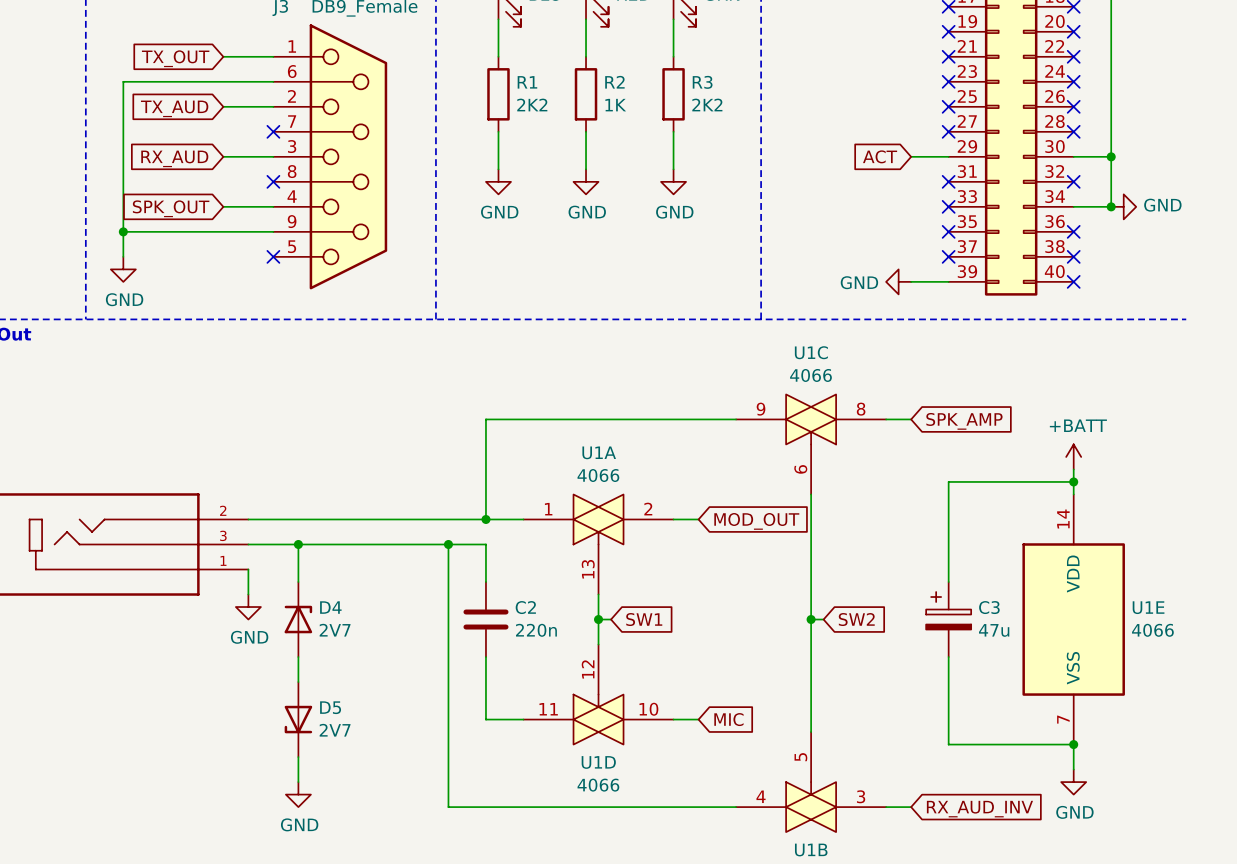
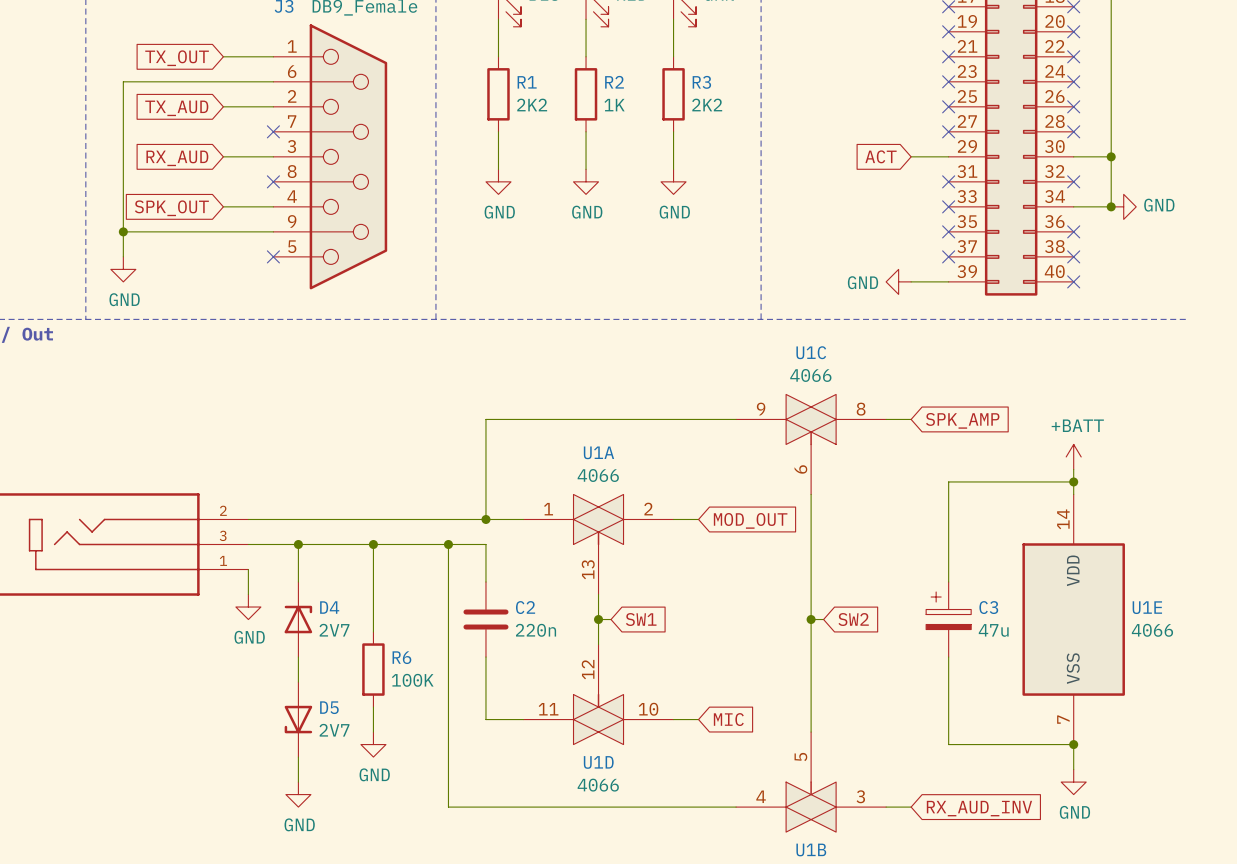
wire: none -> (373, 544) (373, 632)
junction: none -> (373, 544)
R6: none -> 100K (373, 669)
wire: none -> (373, 707) (373, 732)
power symbol: none -> GND (373, 744)

